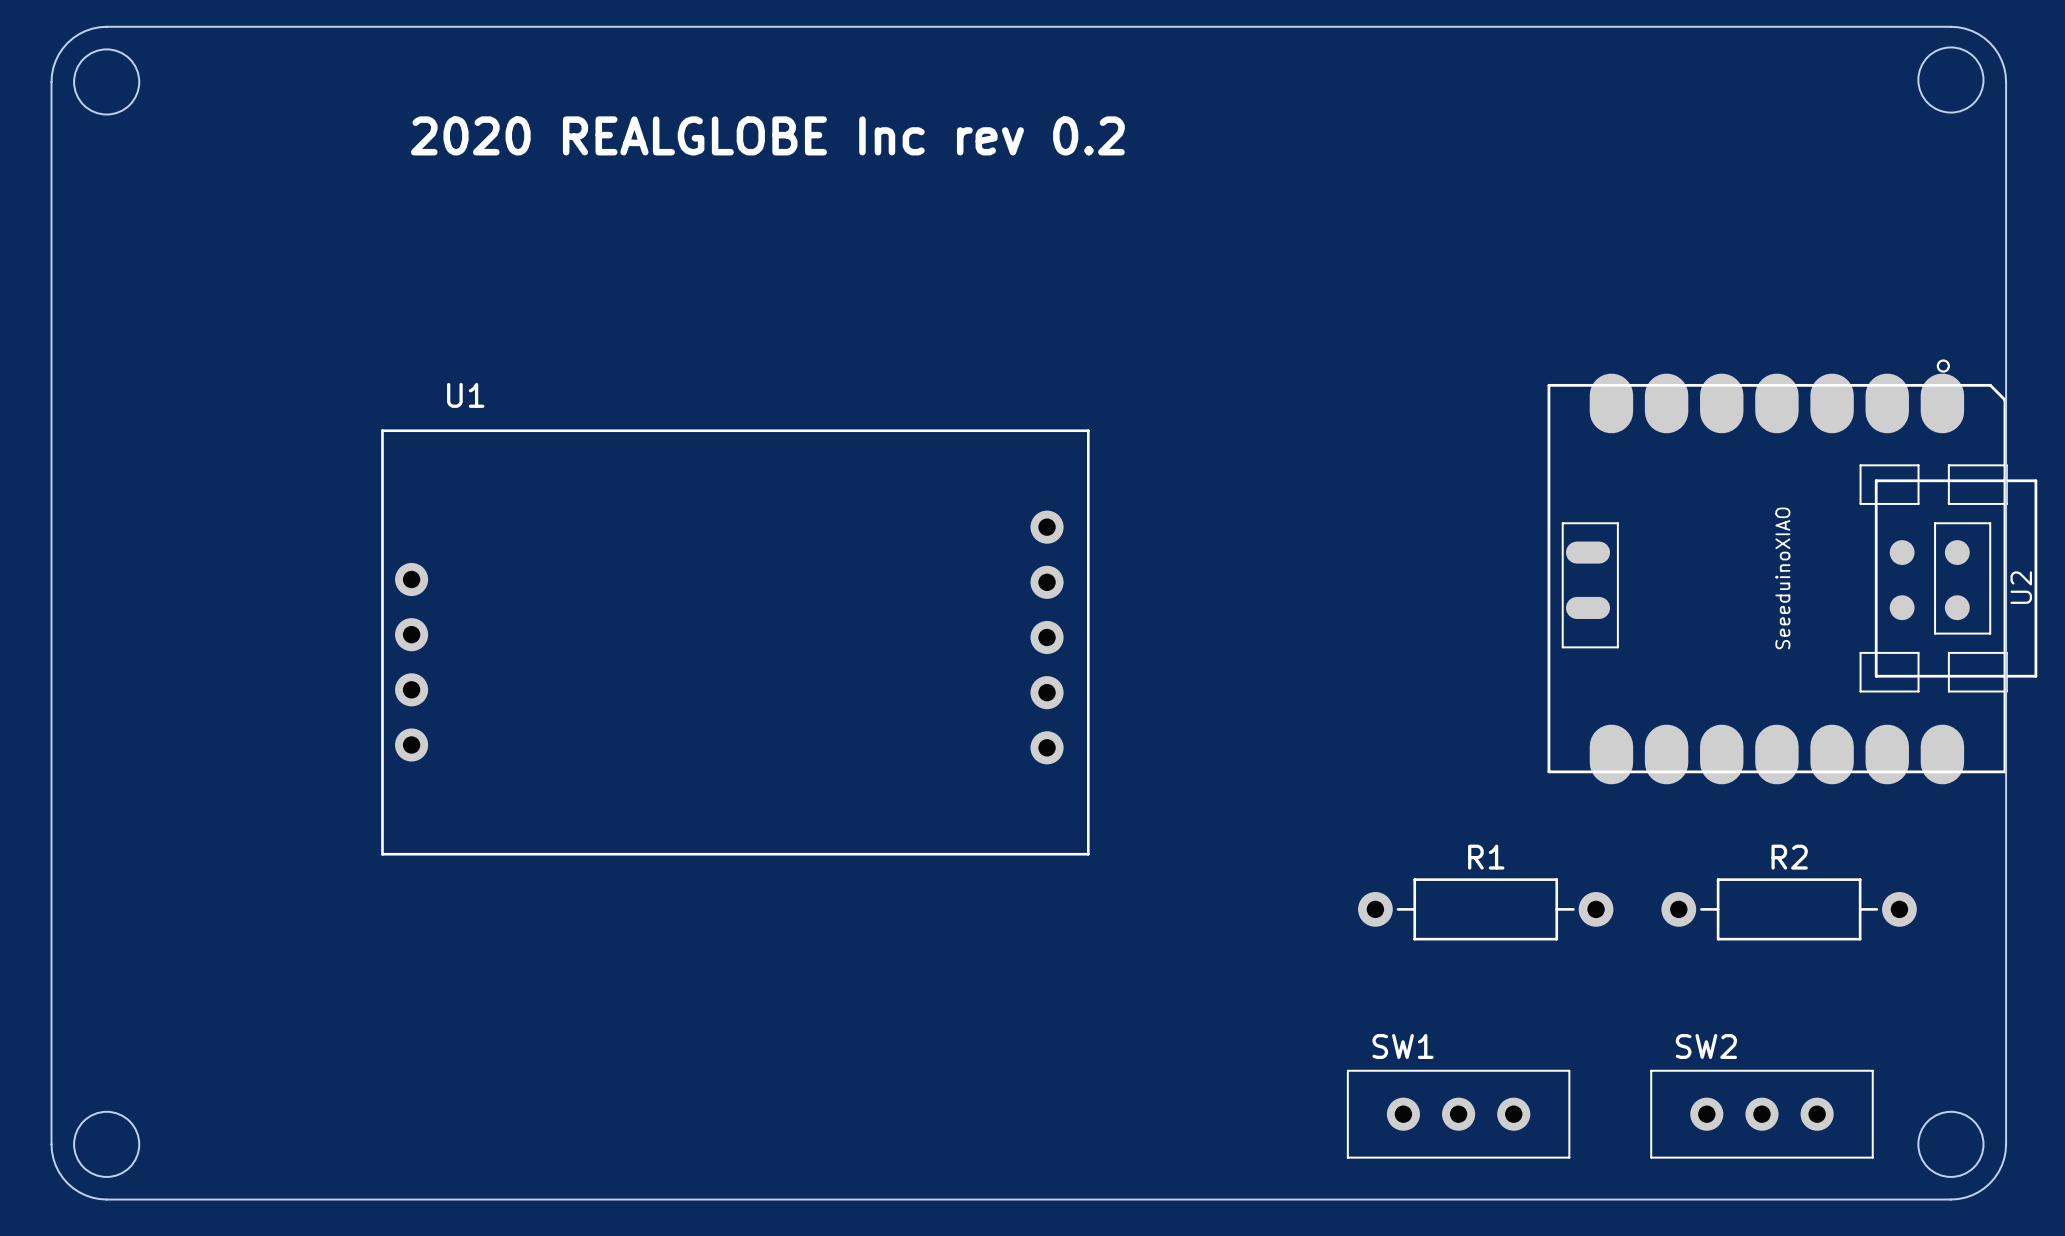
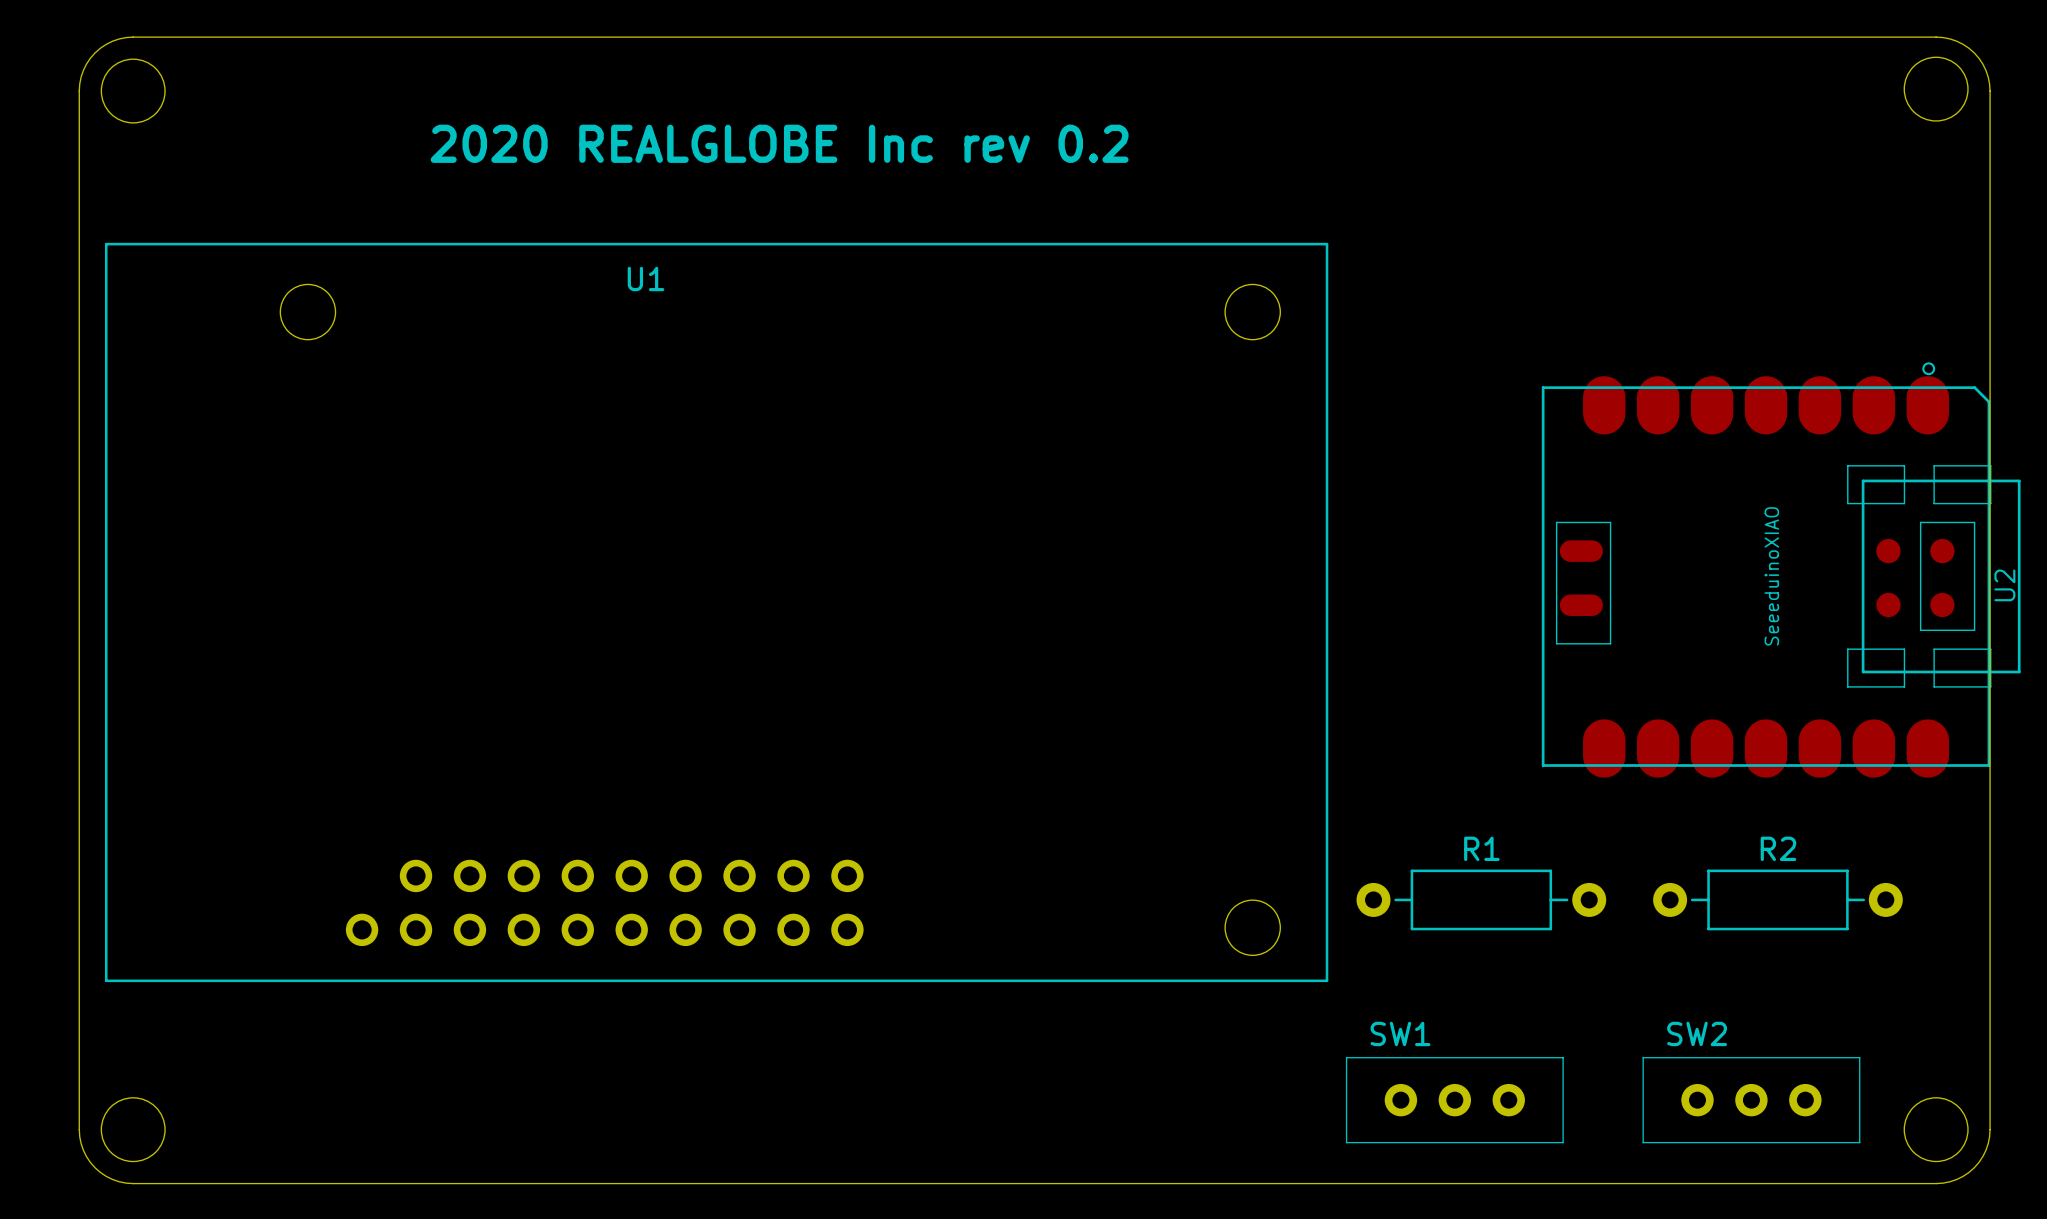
U1 name position: U1 (465, 395) -> U1 (646, 278)
U1 footprint: [381, 429, 1090, 856] -> [104, 242, 1329, 983]

